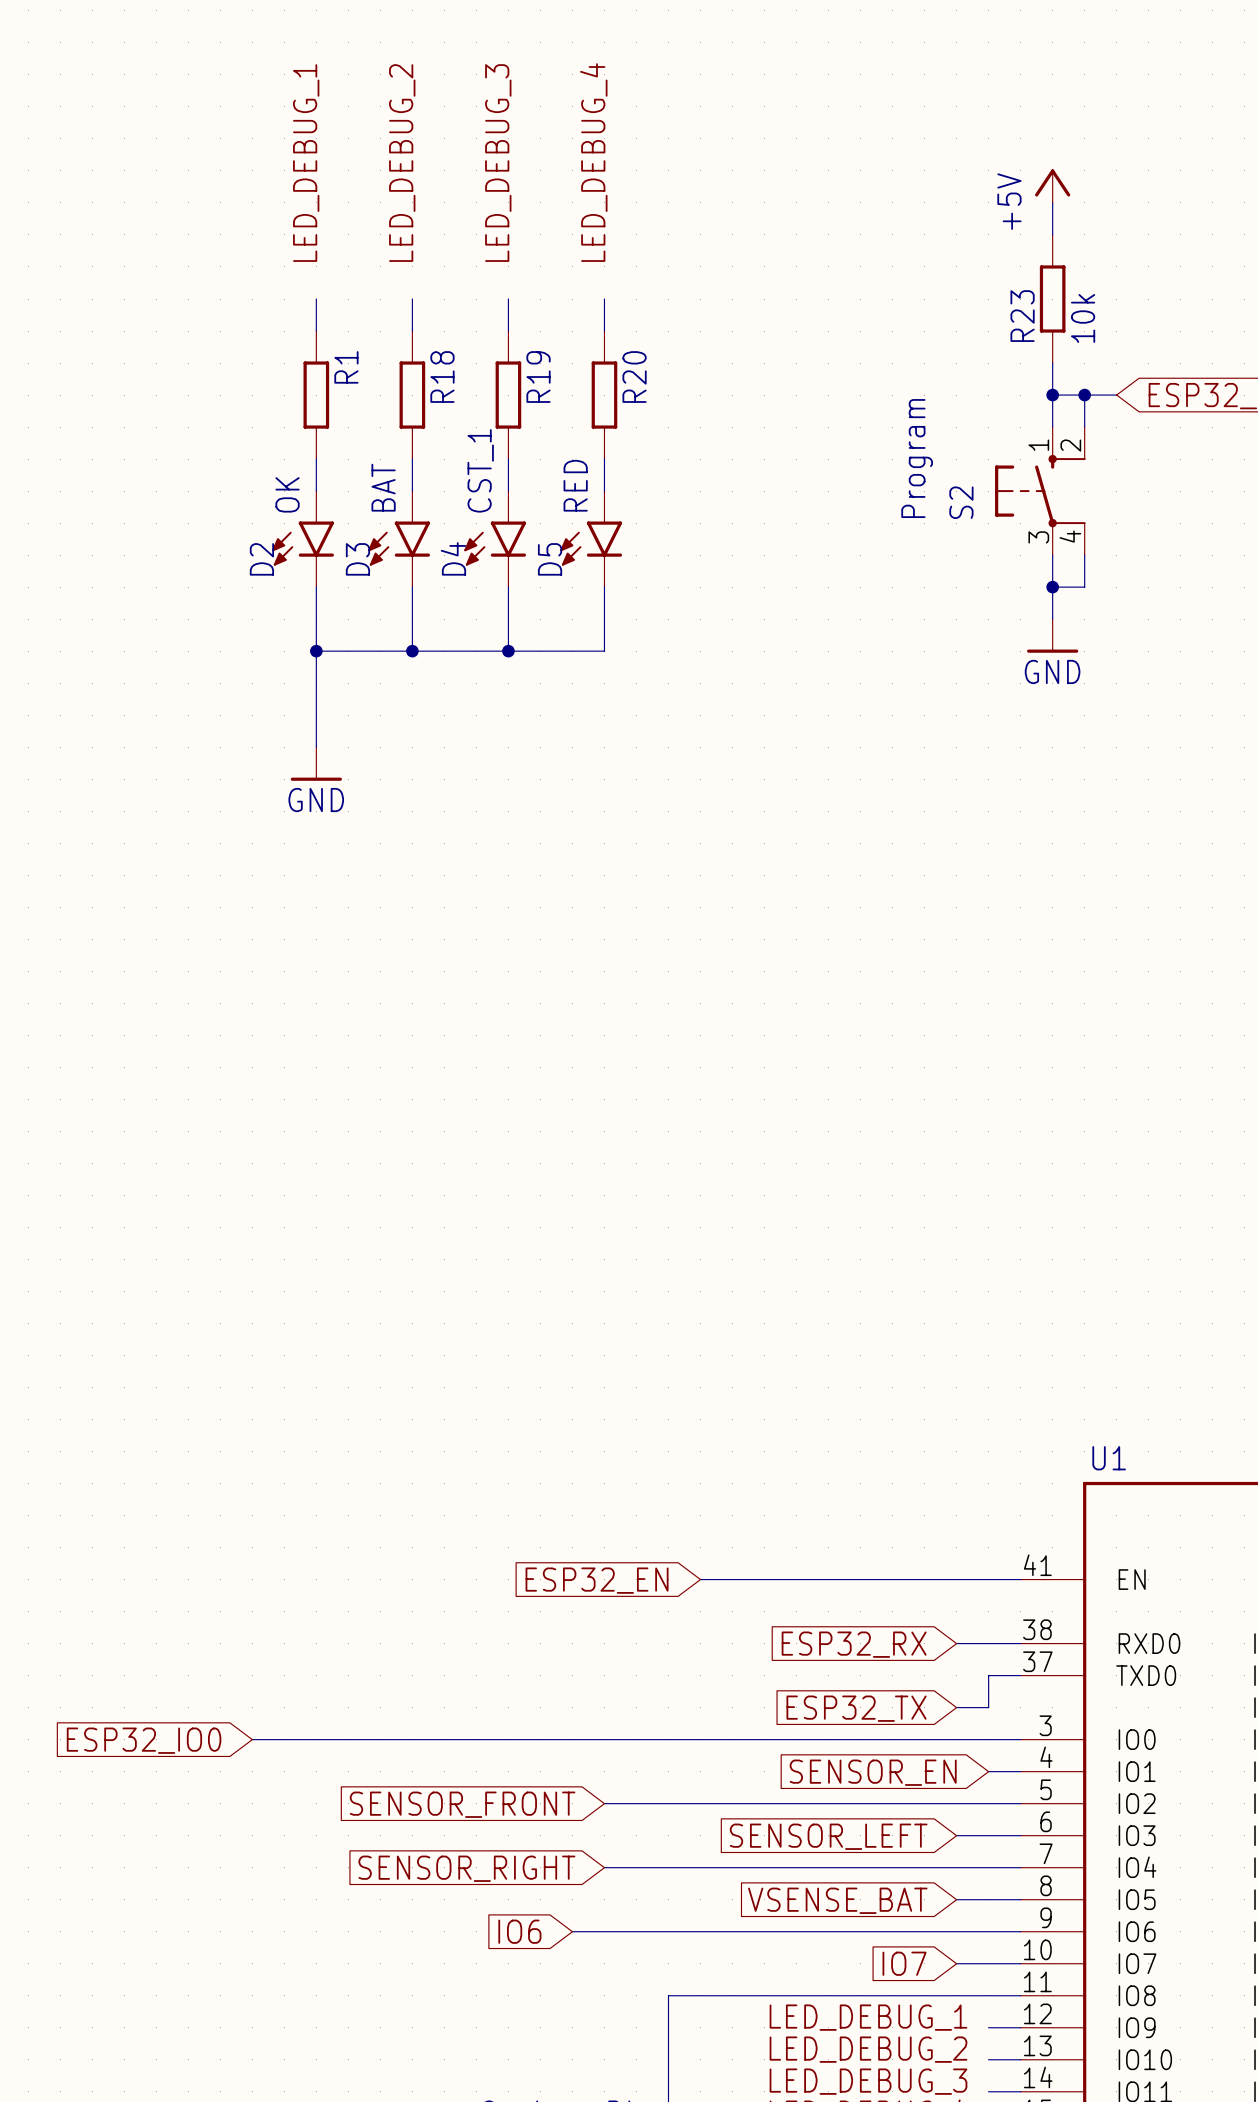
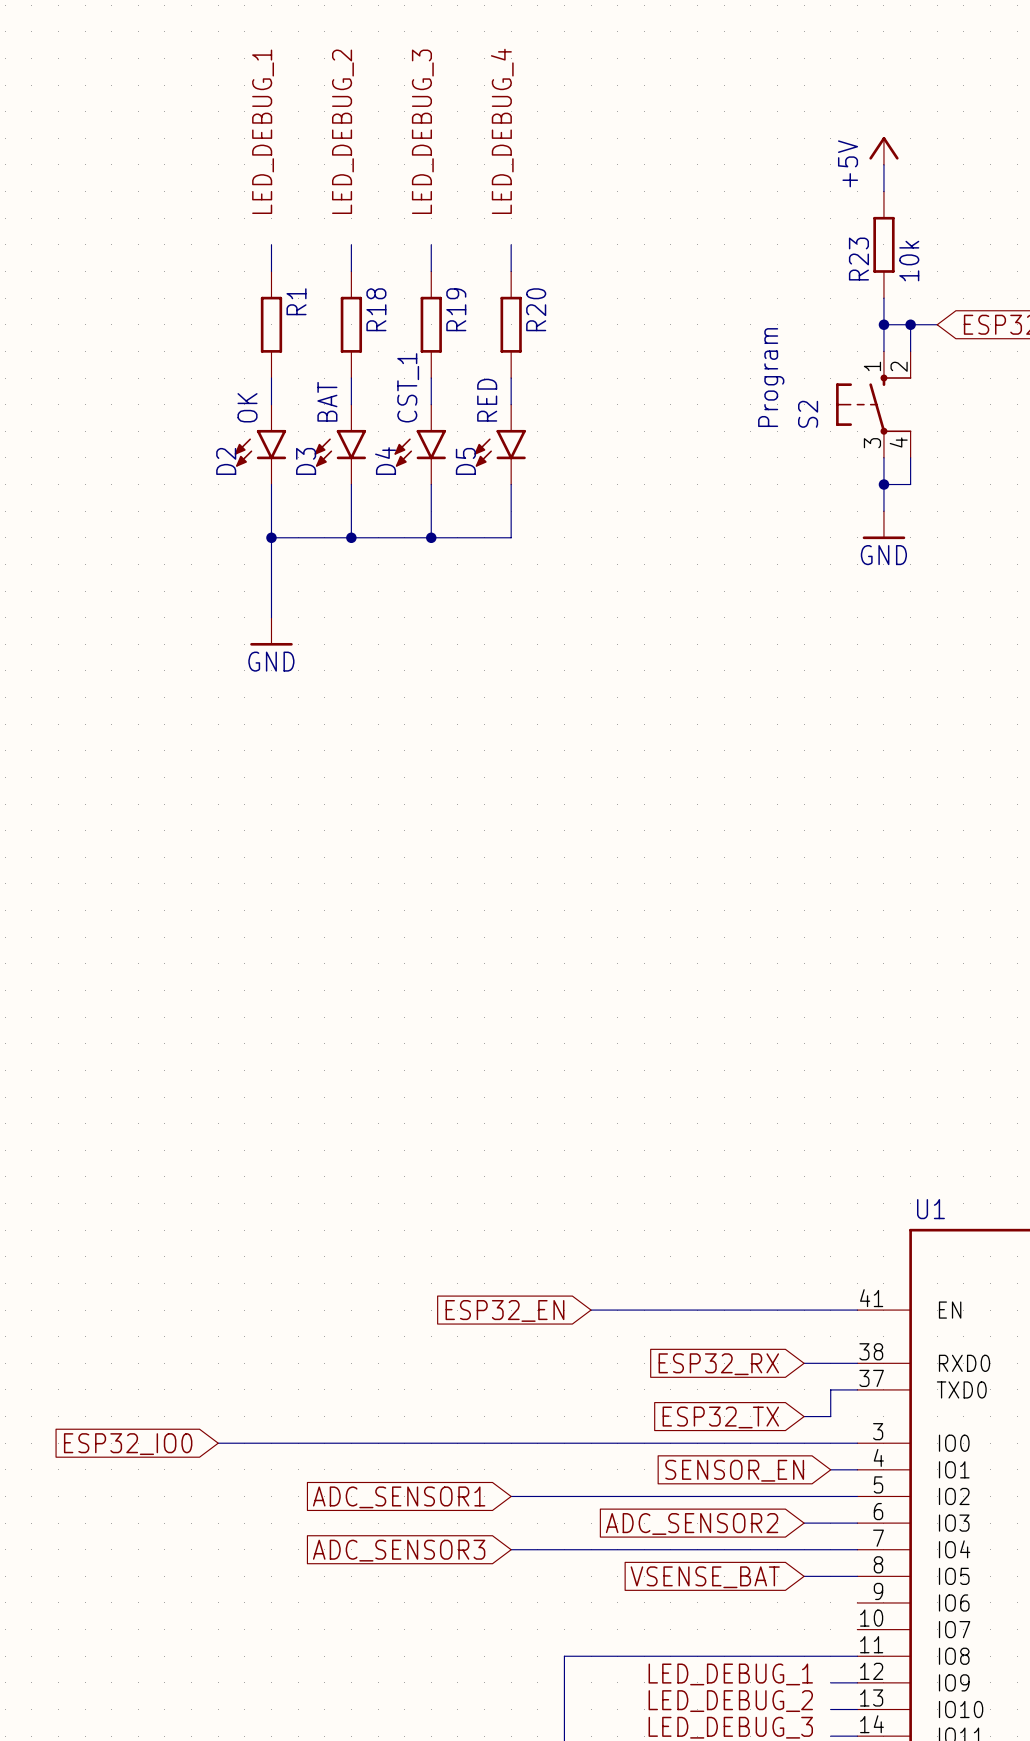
global label: SENSOR_FRONT (462, 1804) -> ADC_SENSOR1 (399, 1497)
global label: SENSOR_LEFT (828, 1836) -> ADC_SENSOR2 (692, 1523)
global label: SENSOR_RIGHT (466, 1868) -> ADC_SENSOR3 (399, 1550)
global label: IO6 (519, 1931) -> none
wire: (572, 1931) (1020, 1931) -> none
global label: IO7 (904, 1963) -> none
wire: (956, 1963) (1020, 1963) -> none

